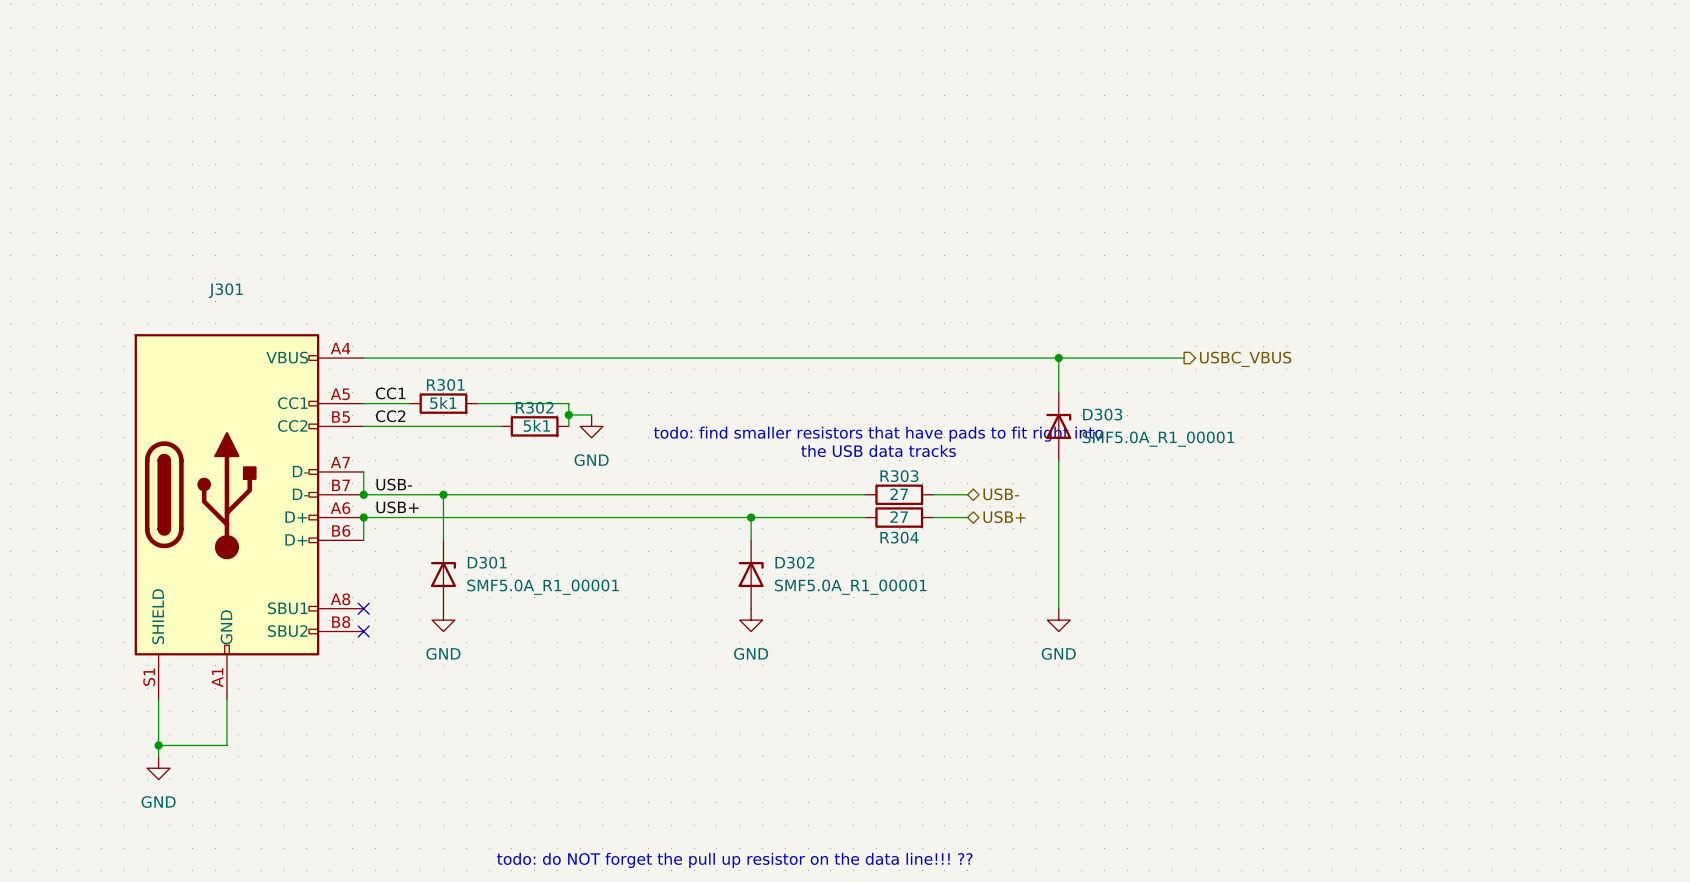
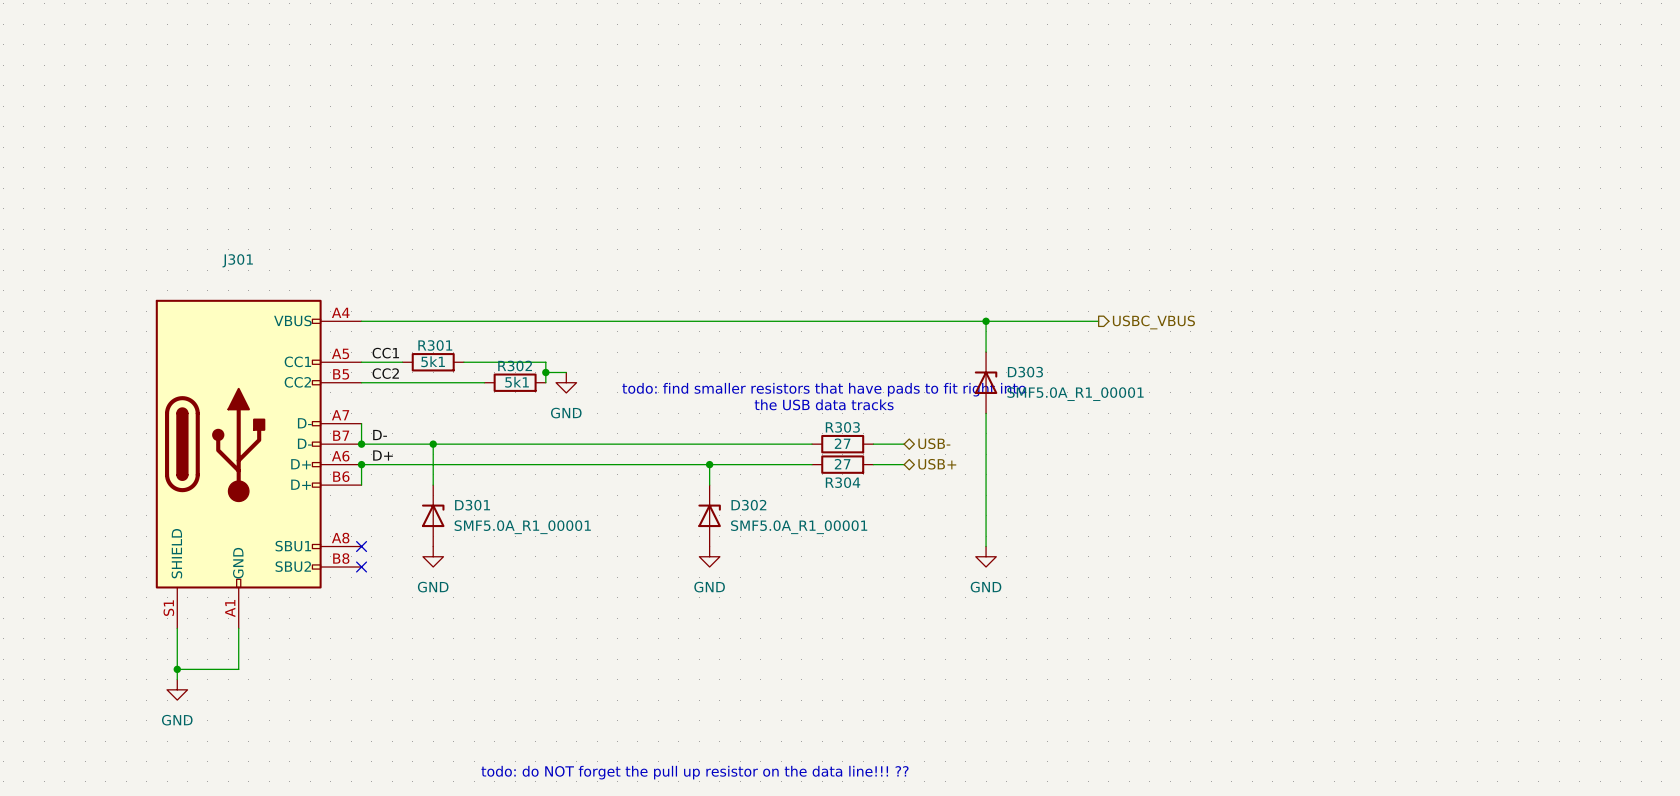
label: USB- (394, 484) -> D- (380, 435)
label: USB+ (397, 507) -> D+ (383, 455)

